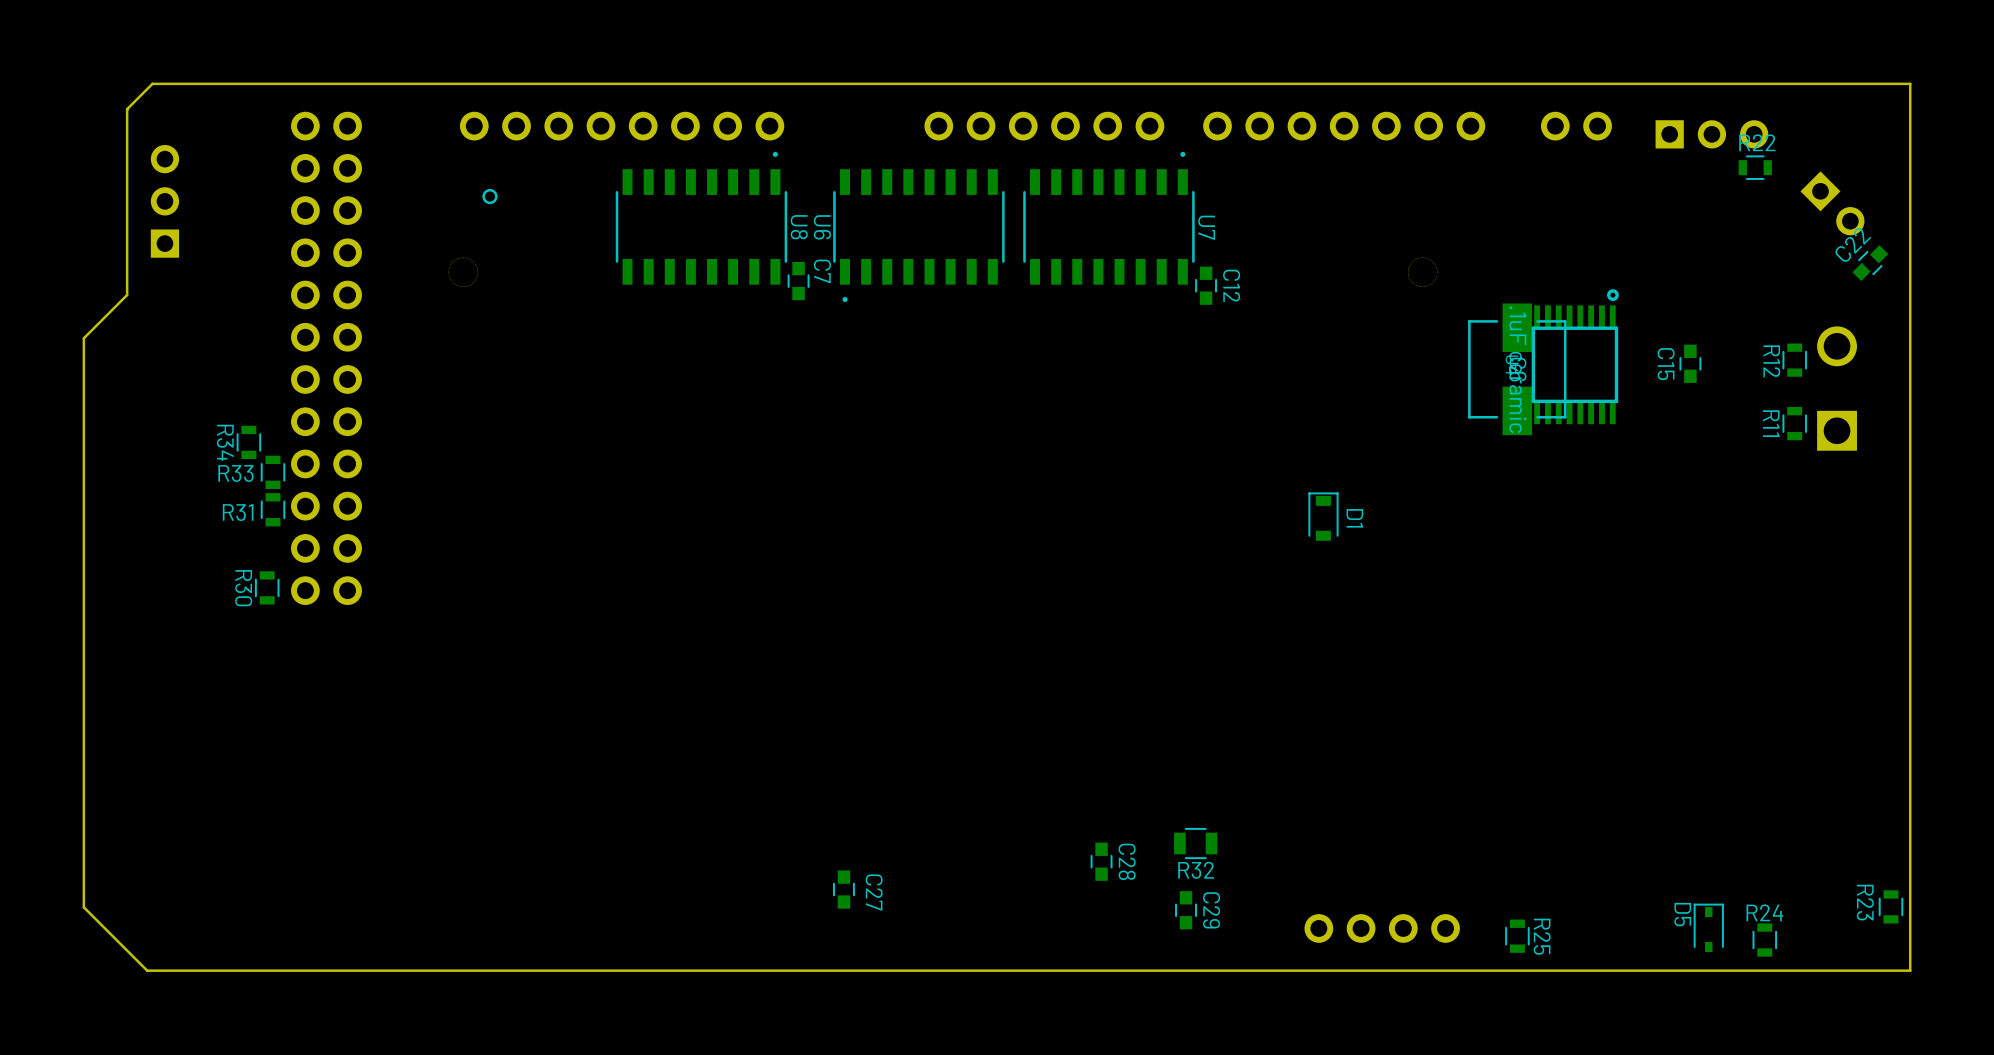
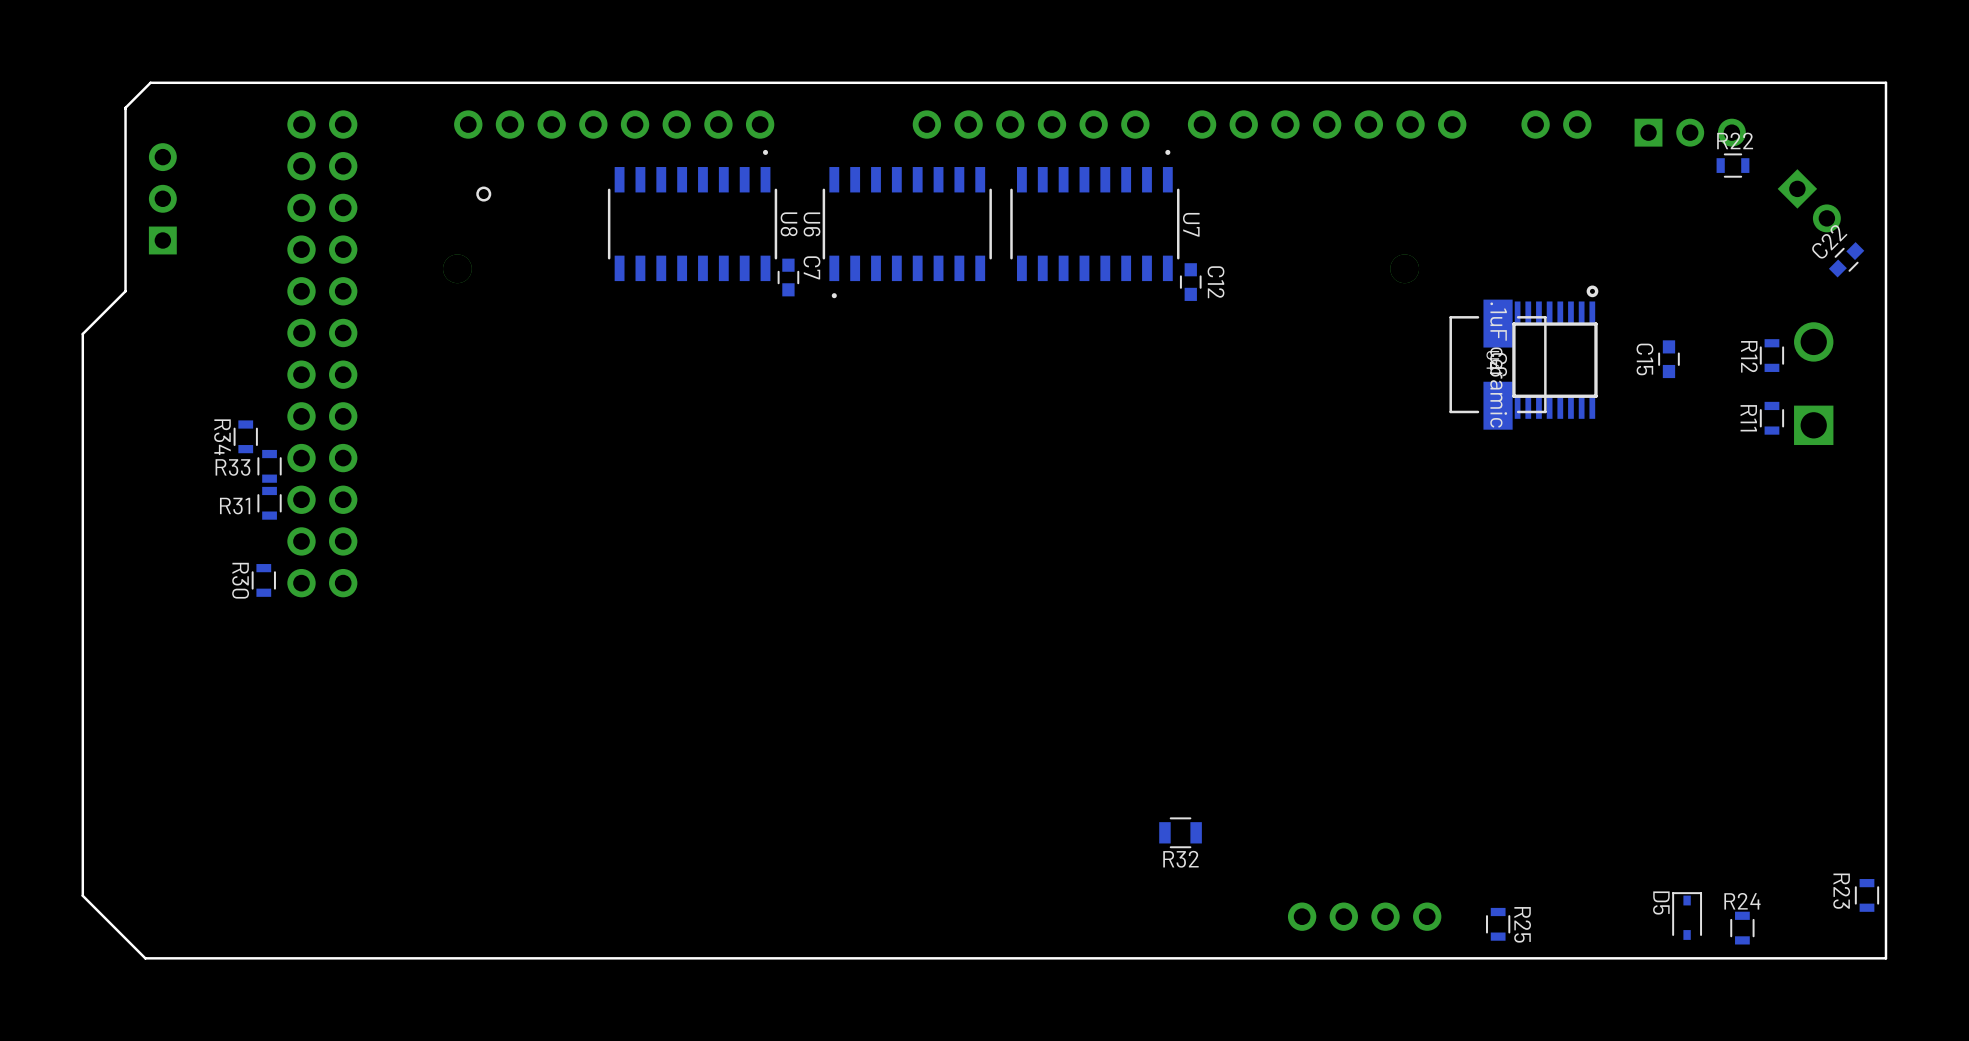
D1: (1323, 516) -> none
C28: (1101, 861) -> none
C27: (843, 889) -> none
C29: (1186, 910) -> none

